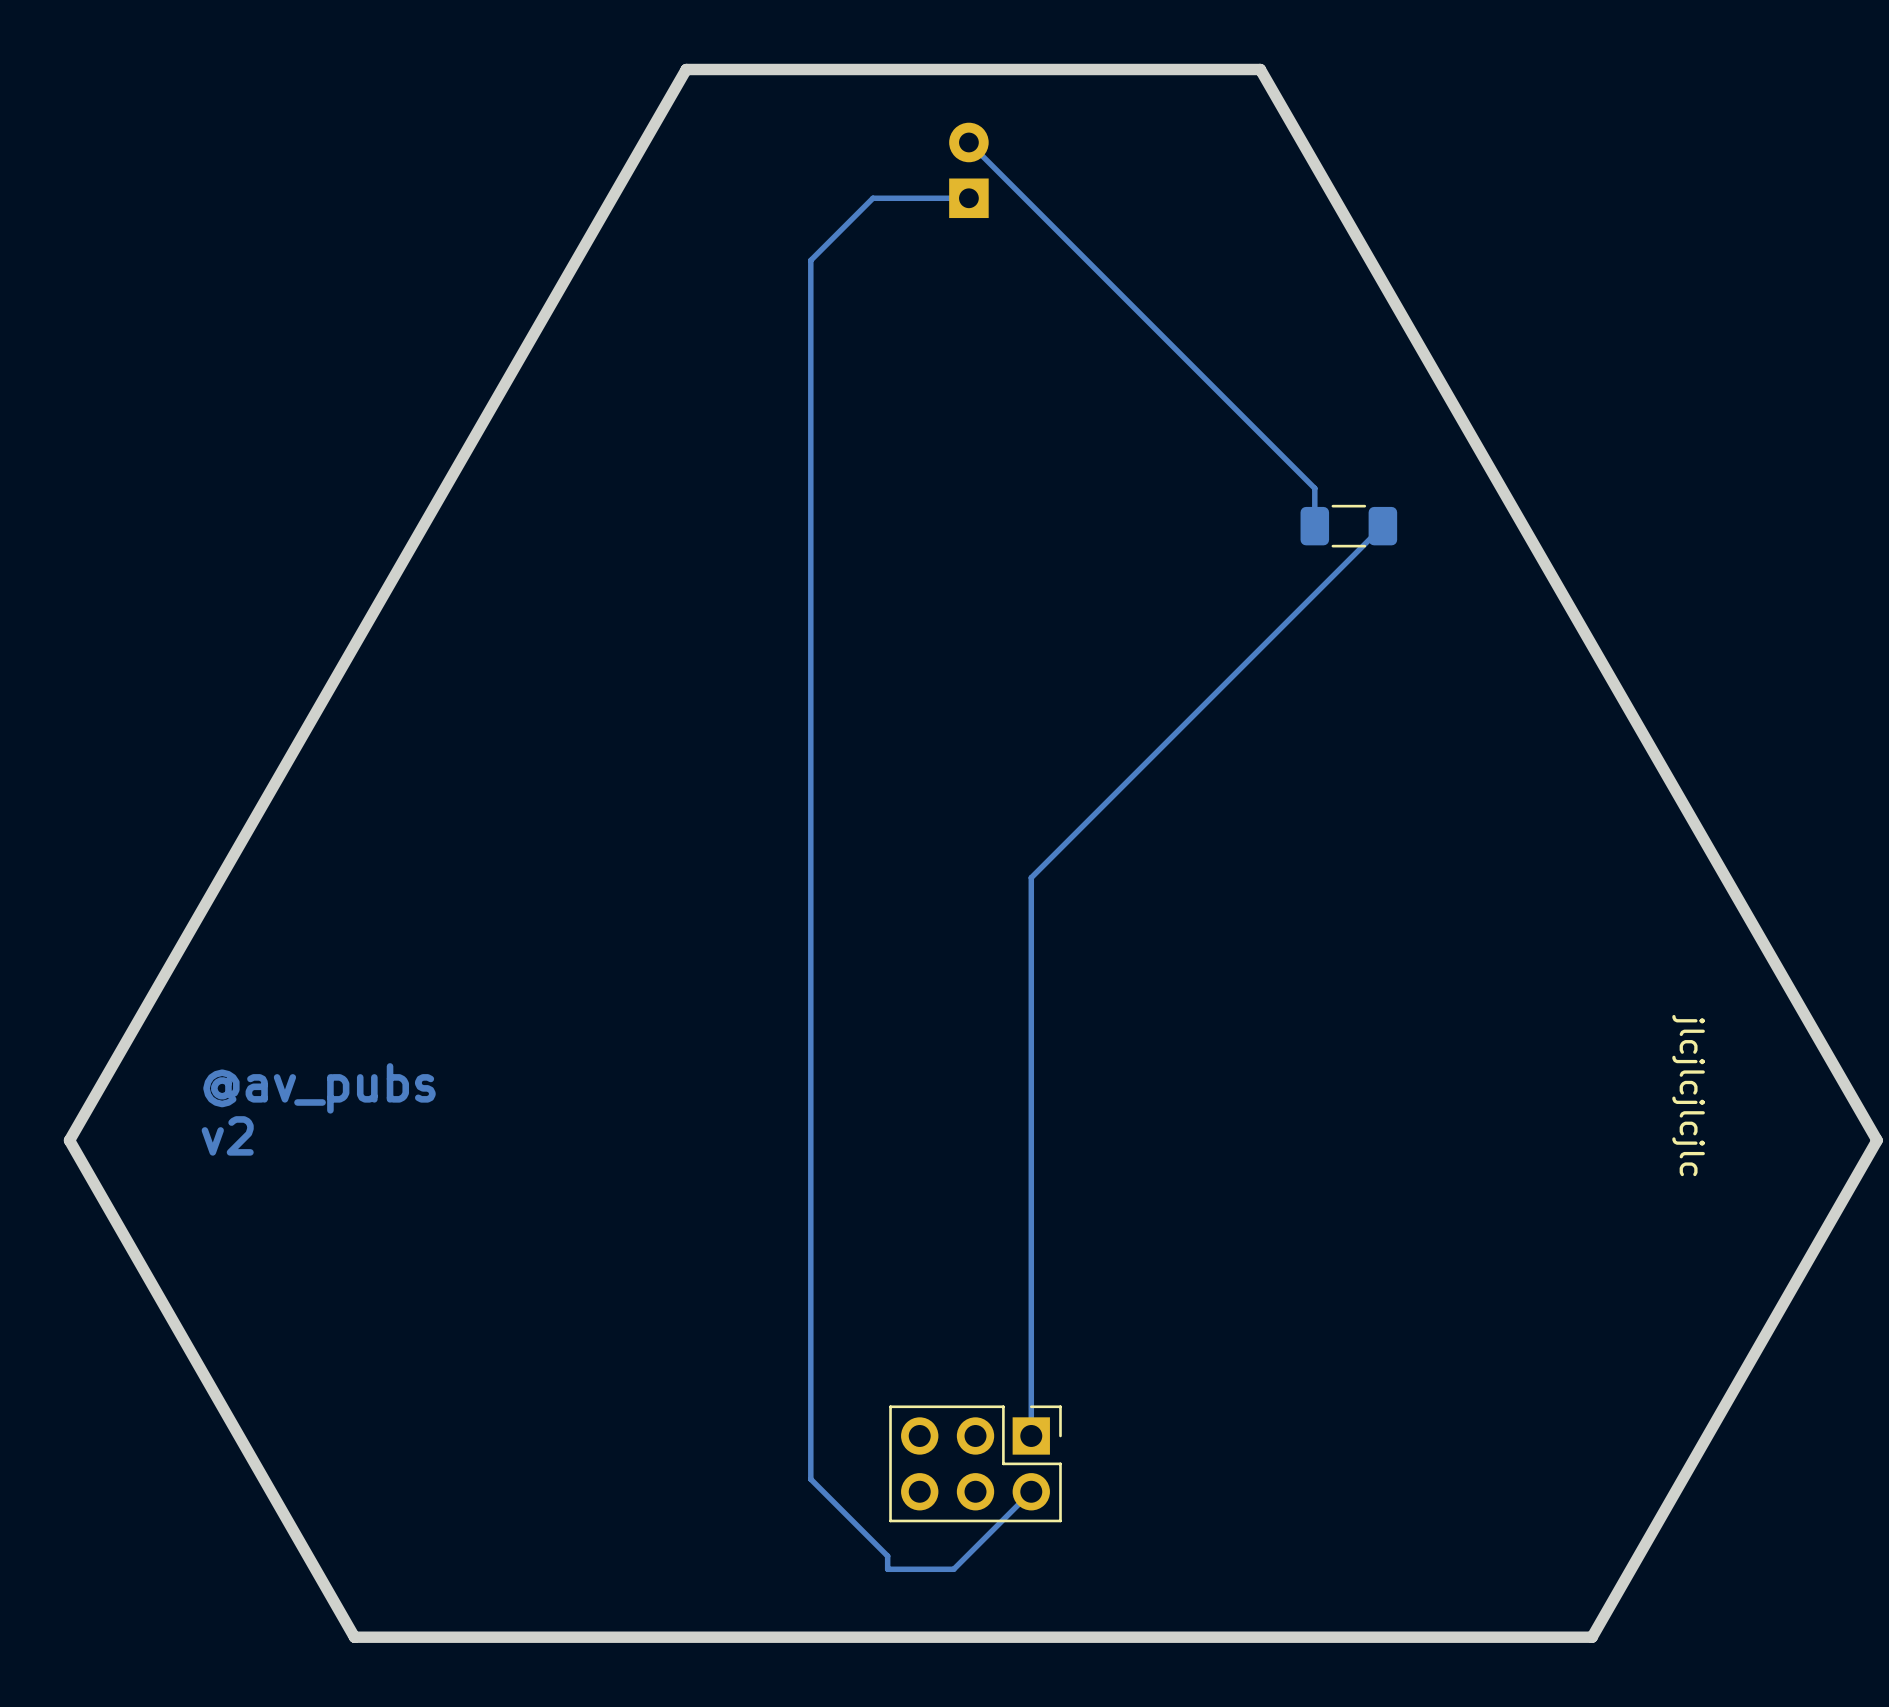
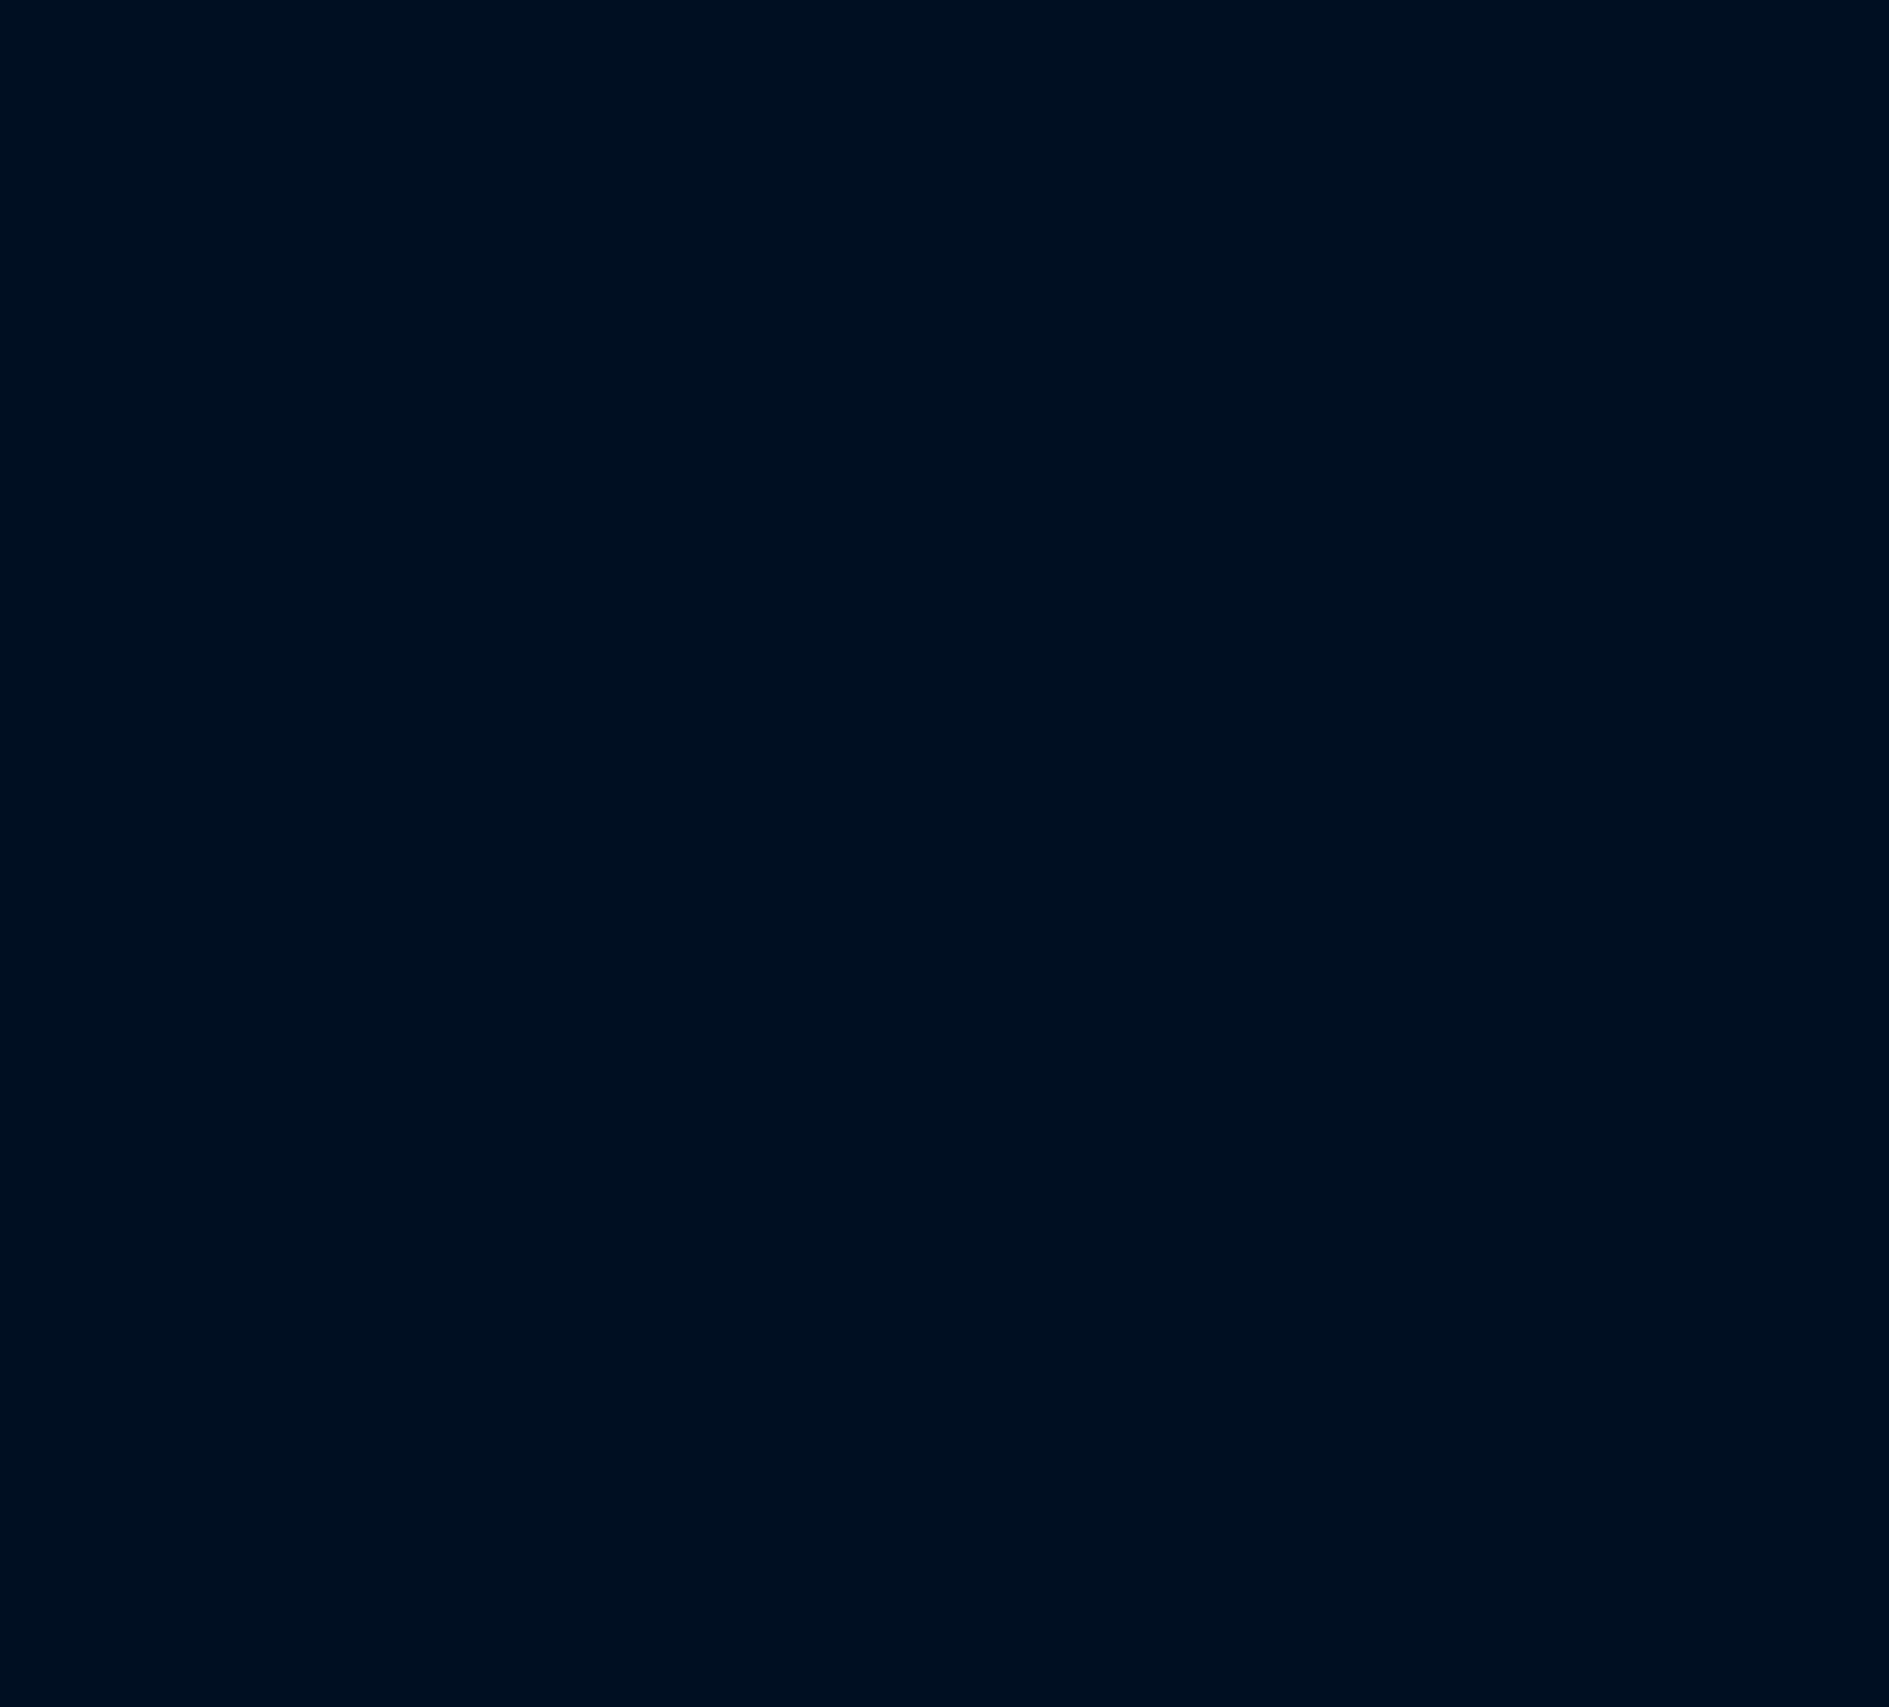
board edge: (1260, 69) (1877, 1140) (1592, 1637) (354, 1637) (69, 1140) (686, 69) (1260, 69) -> none
track: (968, 142) (1314, 488) (1314, 526) -> none
part: (968, 170) -> none
track: (968, 198) (872, 198) (810, 260) (810, 1479) (887, 1556) (887, 1569) (953, 1569) (1031, 1491) -> none
part: (1348, 526) -> none
track: (1382, 526) (1031, 877) (1031, 1435) -> none
text: @av_pubs (319, 1088) -> none
text: jlcjlcjlcjlc (1688, 1095) -> none
text: v2 (227, 1135) -> none
part: (975, 1463) -> none

